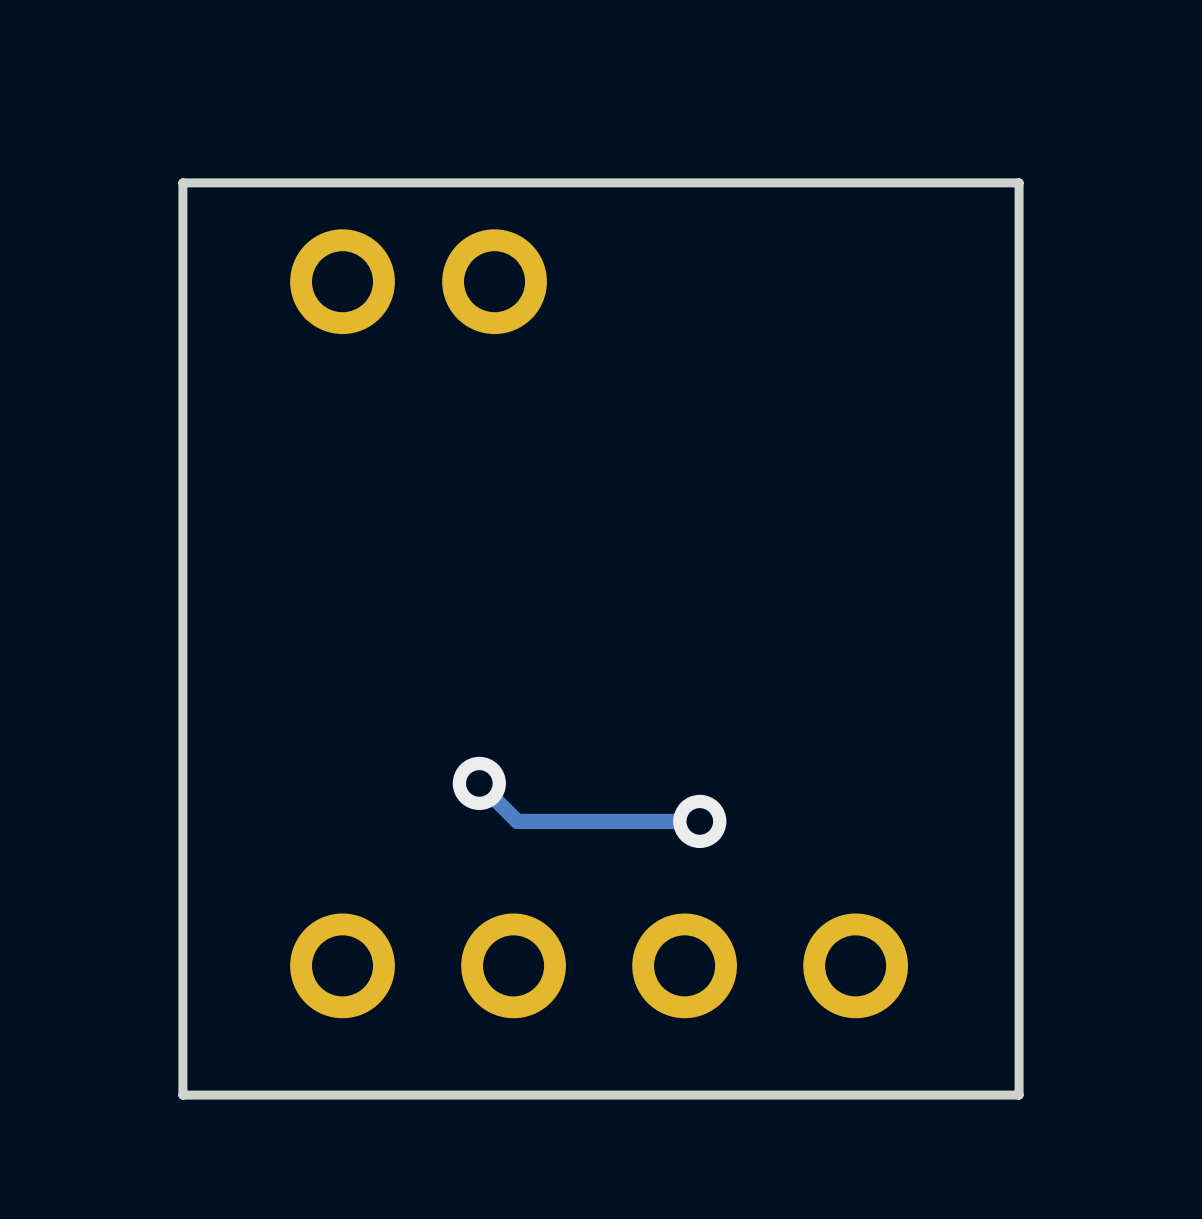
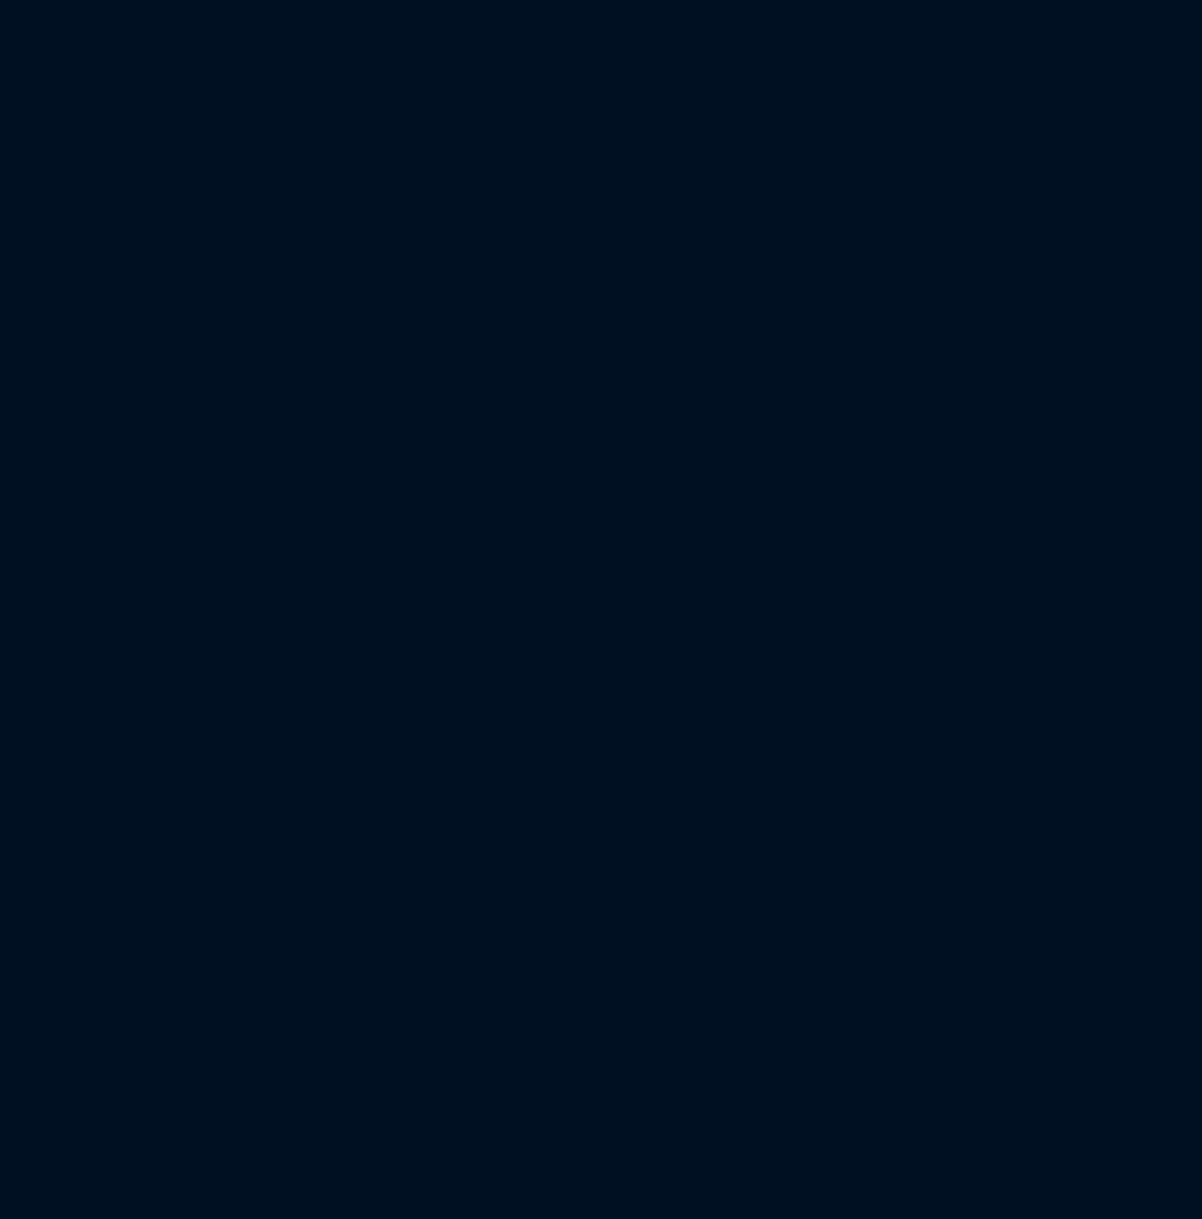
board edge: (1019, 182) (1019, 1095) (182, 1095) (182, 182) (1019, 182) -> none
part: (342, 281) -> none
part: (494, 281) -> none
track: (479, 783) (517, 821) (699, 821) -> none
via: (479, 783) -> none
via: (699, 821) -> none
part: (342, 965) -> none
part: (513, 965) -> none
part: (684, 965) -> none
part: (855, 965) -> none

